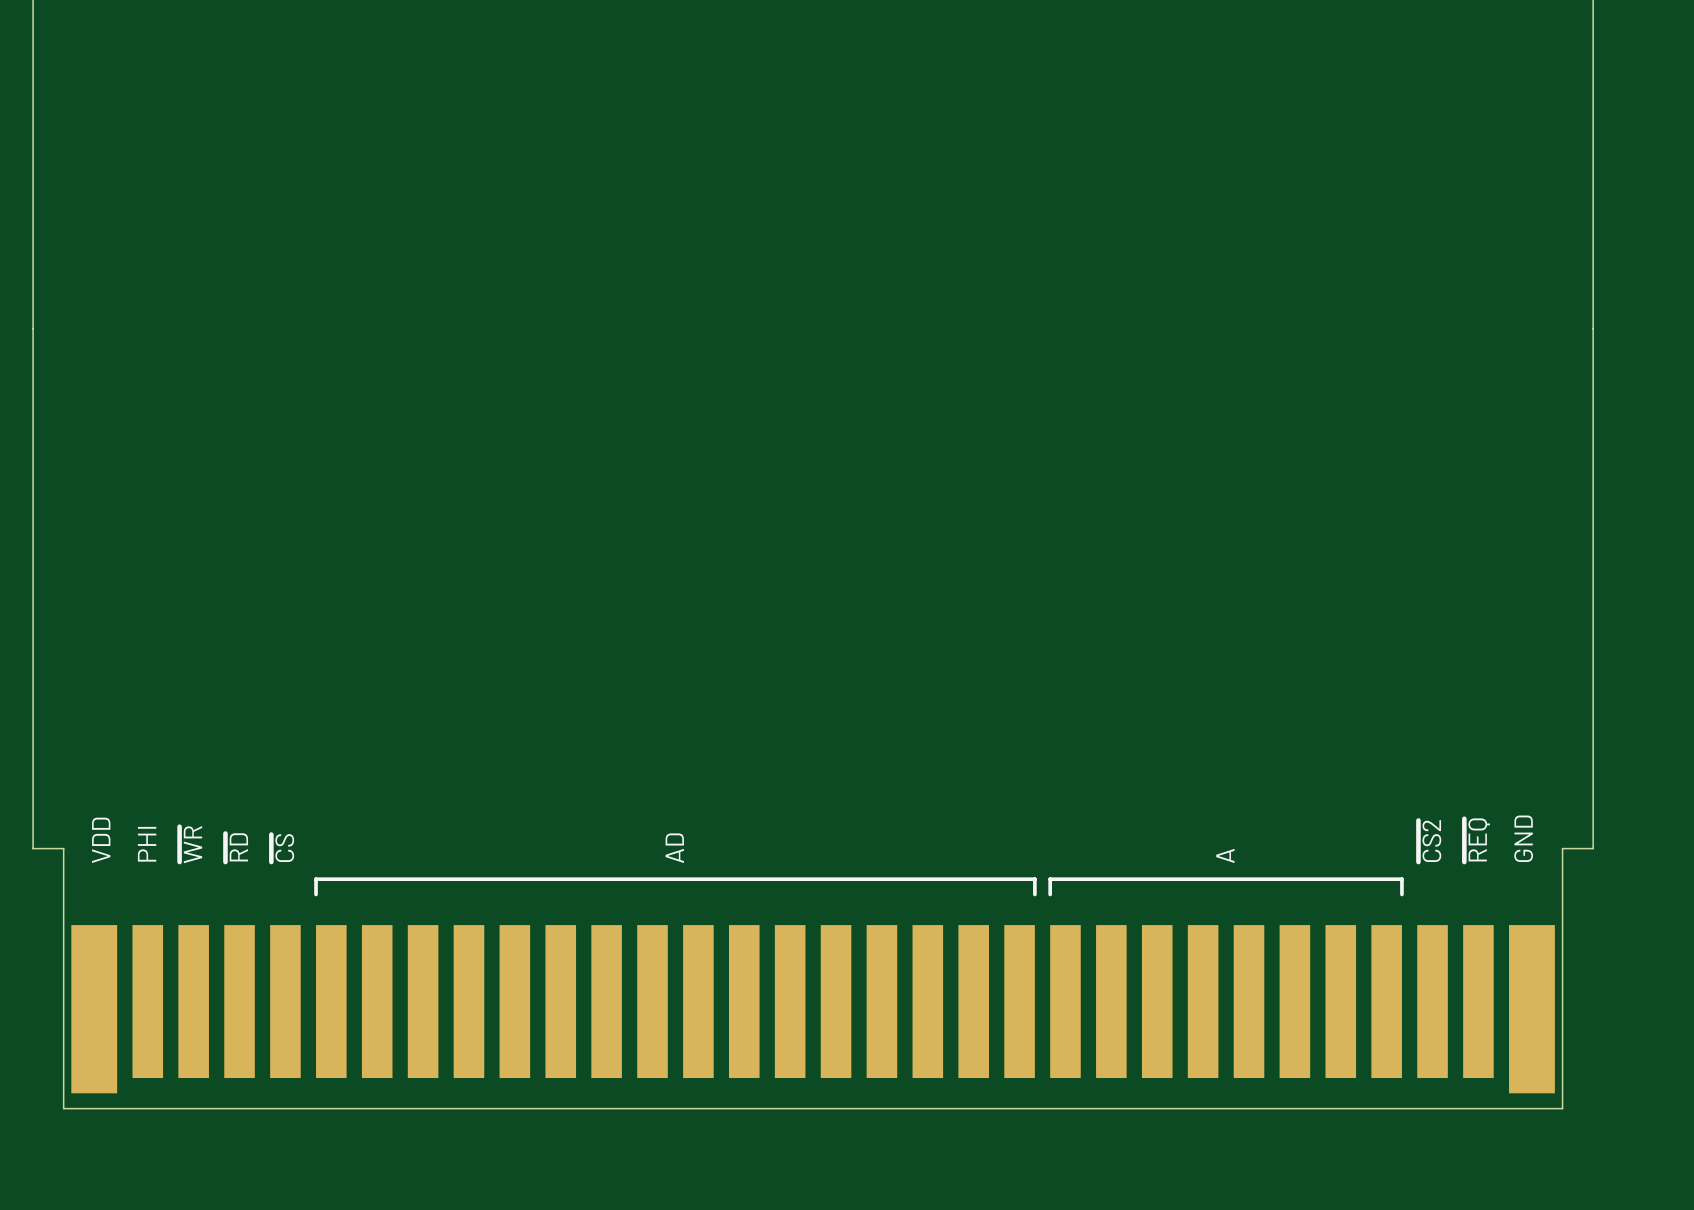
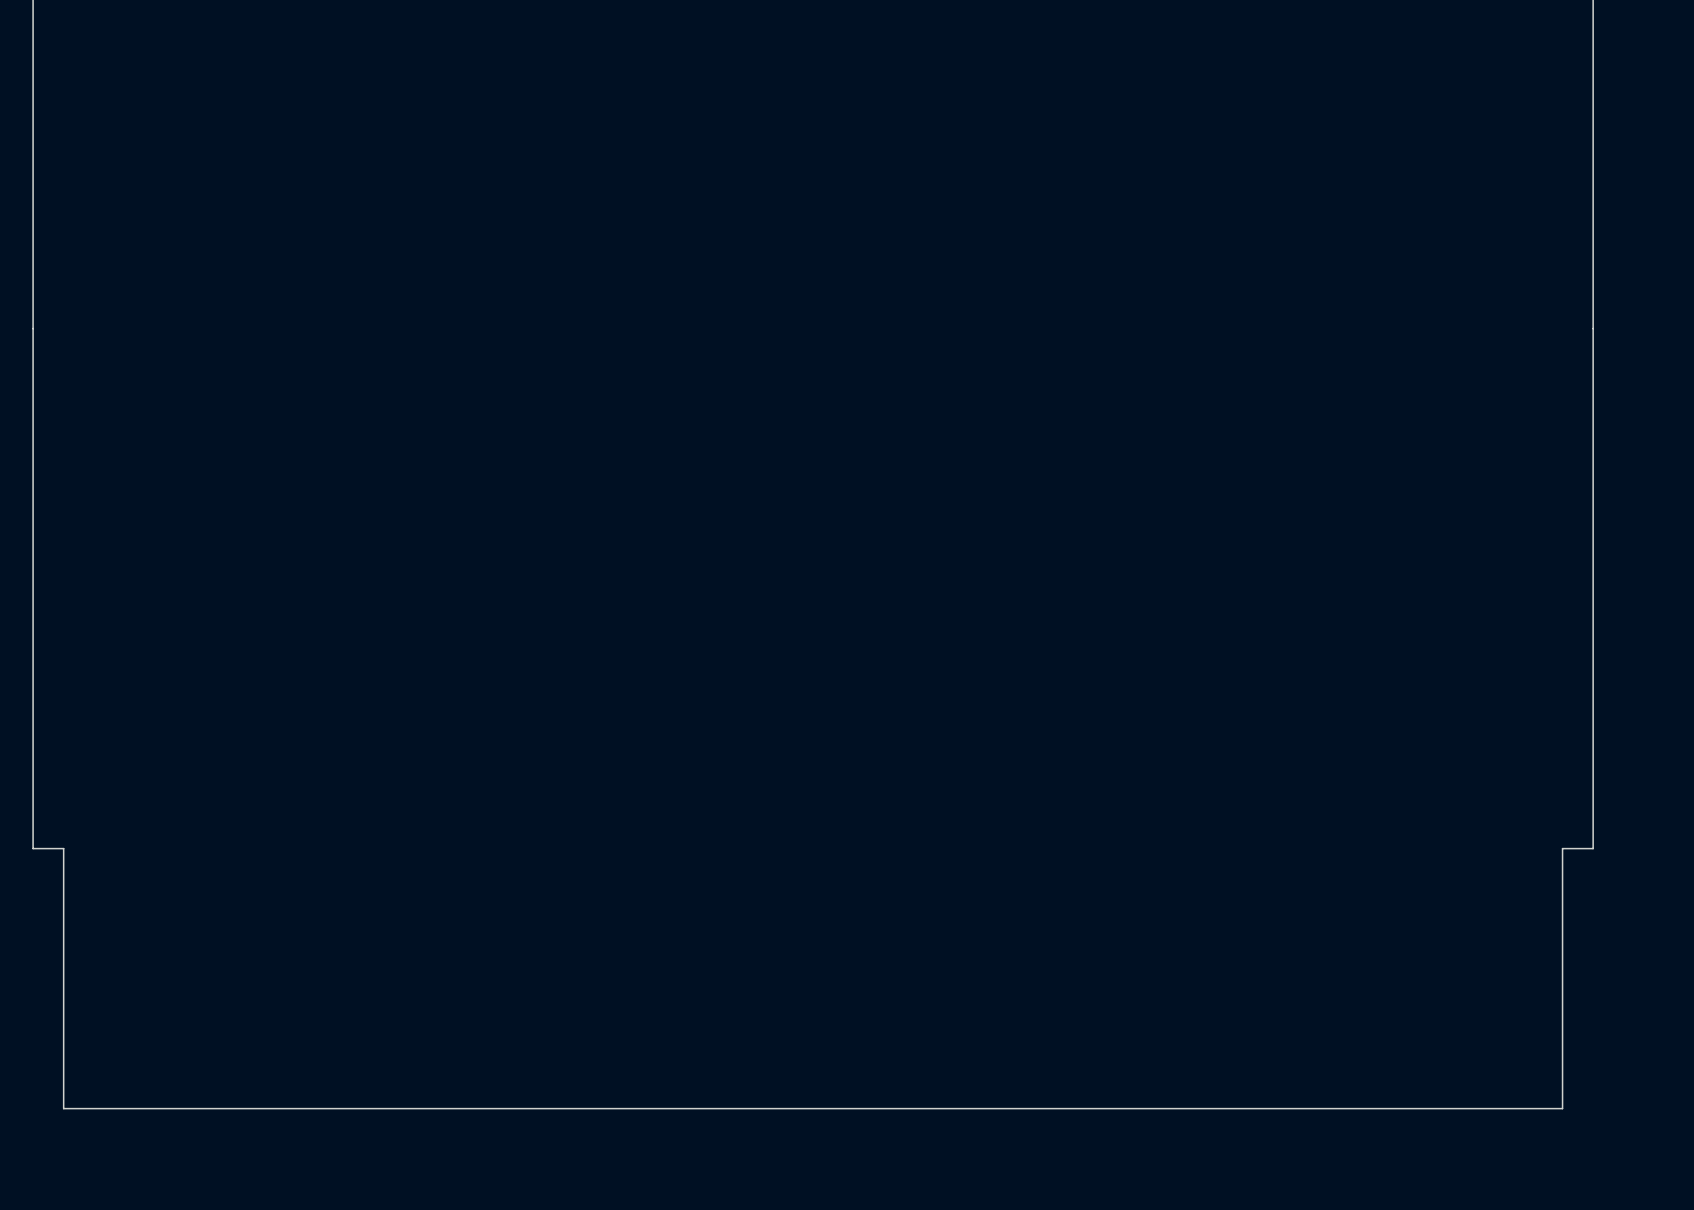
part: (813, 985) -> none

